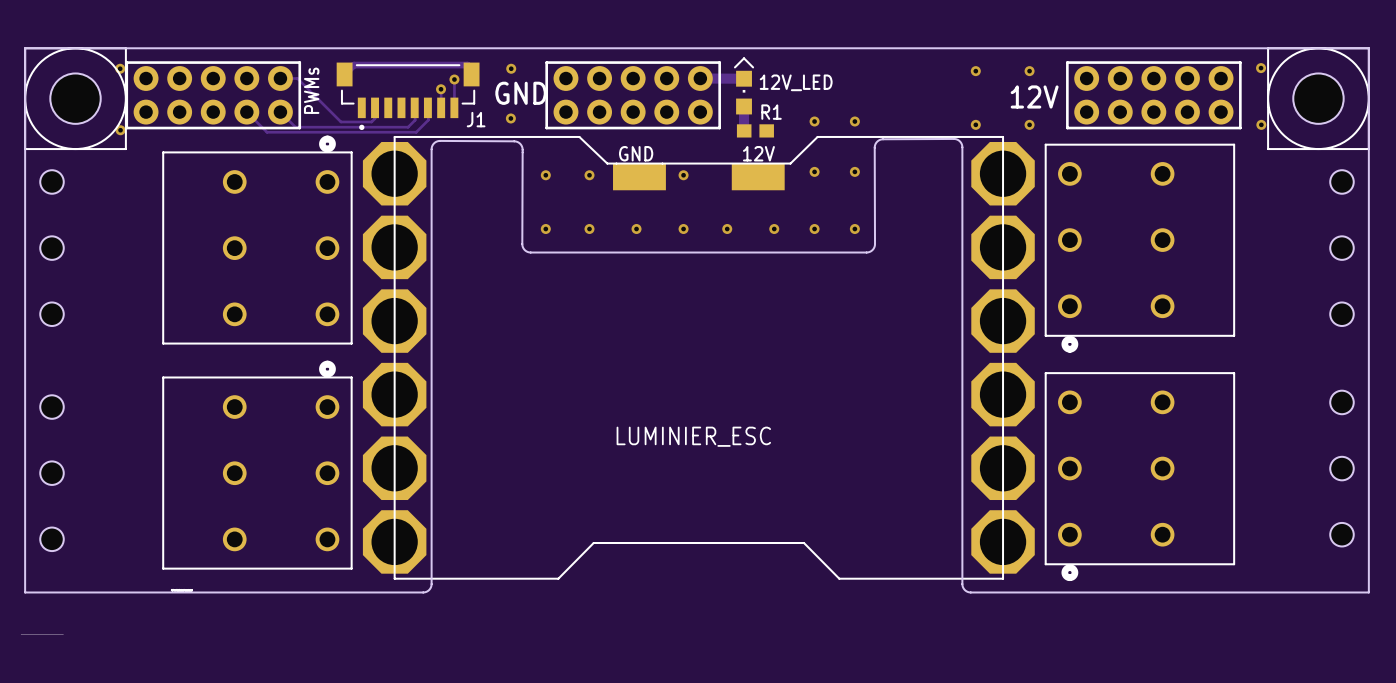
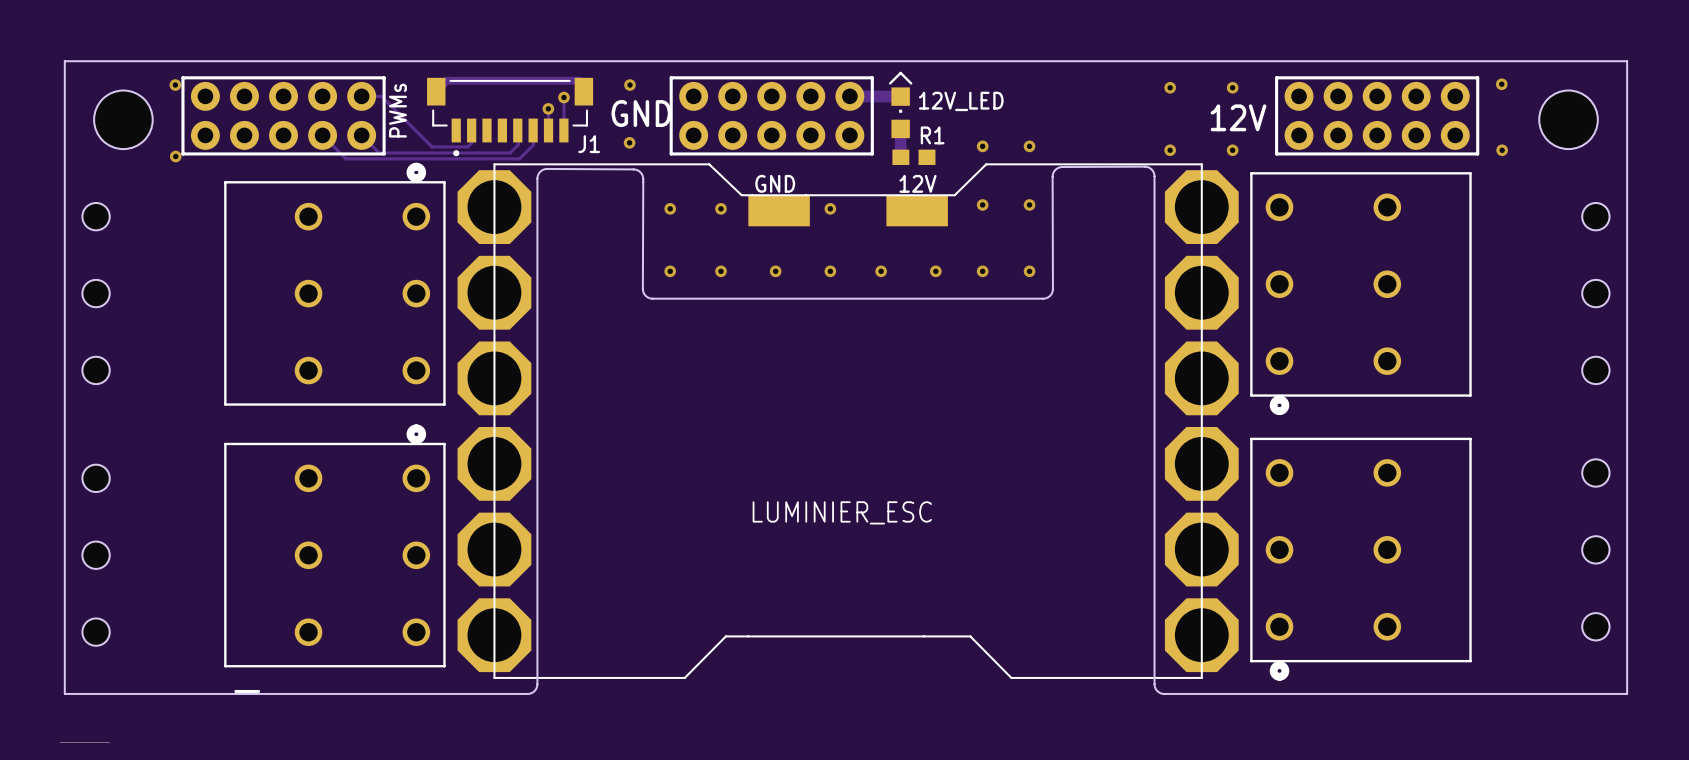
part footprint: [24, 48, 127, 150] -> [94, 90, 153, 150]
part footprint: [1267, 48, 1370, 150] -> [1539, 90, 1598, 150]

